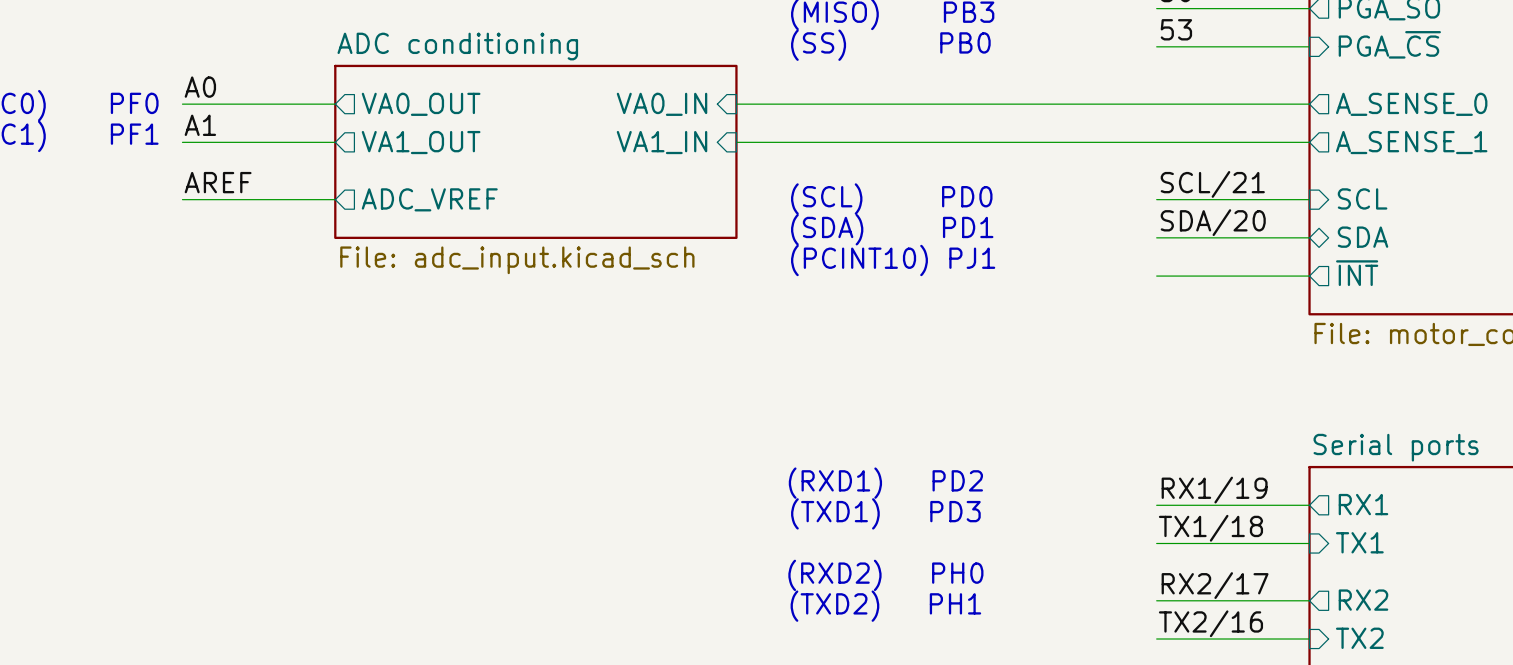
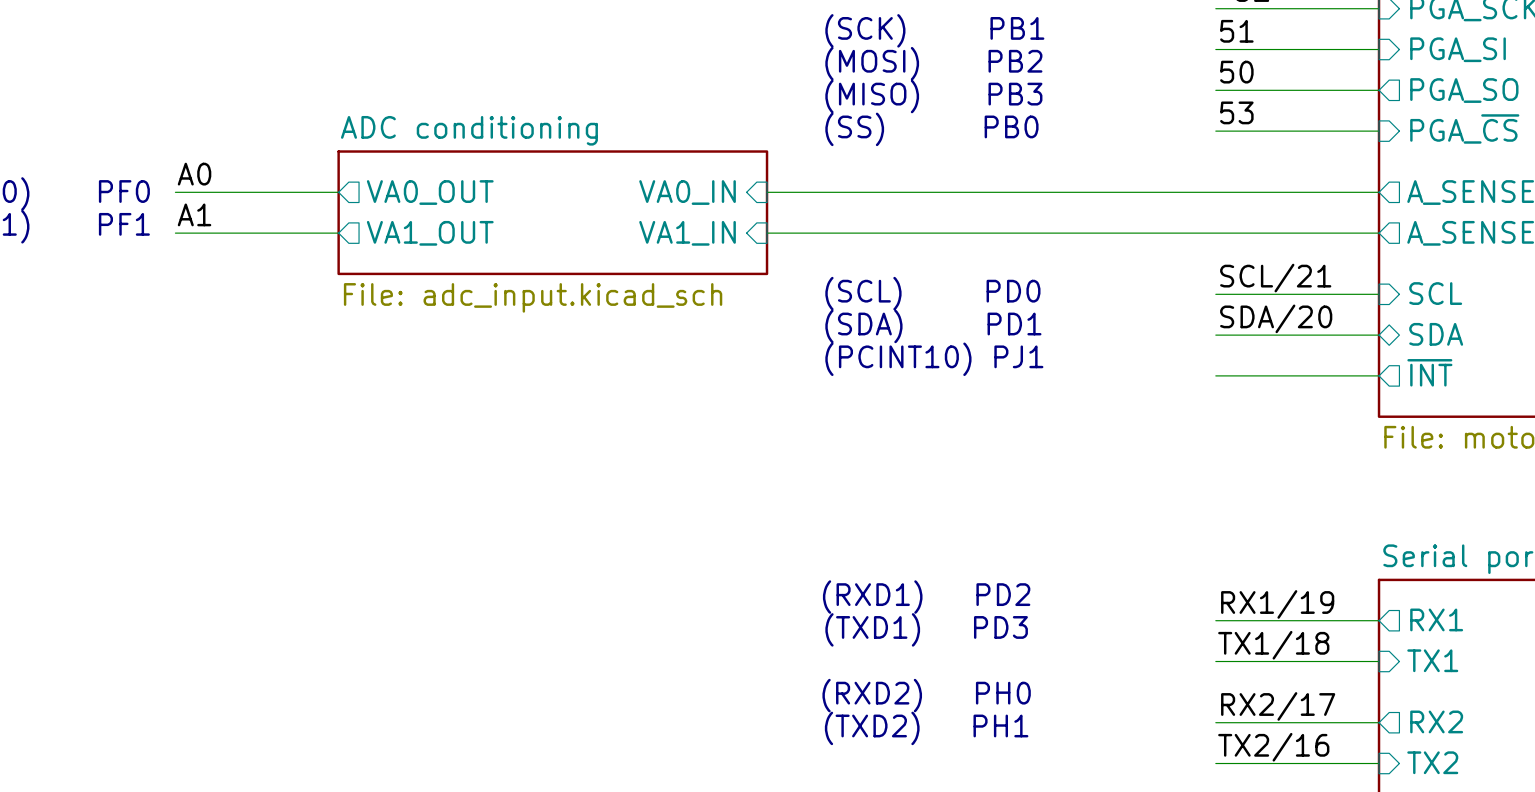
sheet ADC conditioning: none -> File: adc_input.kicad_sch (552, 212)
sheet ADC conditioning: File: adc_input.kicad_sch (535, 151) -> none
label: AREF (218, 182) -> none
wire: (182, 199) (335, 199) -> none
sheet pin: ADC_VREF (429, 199) -> none

